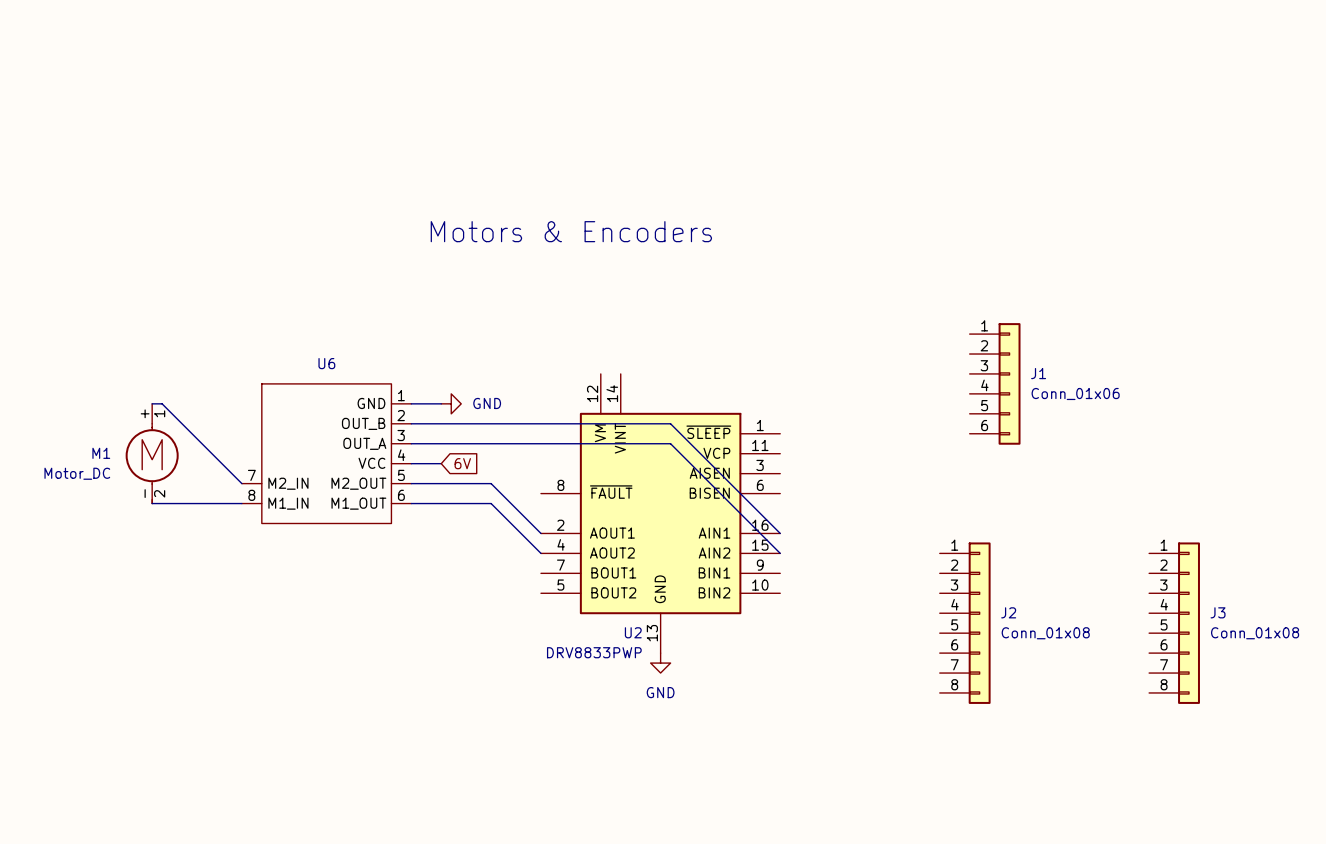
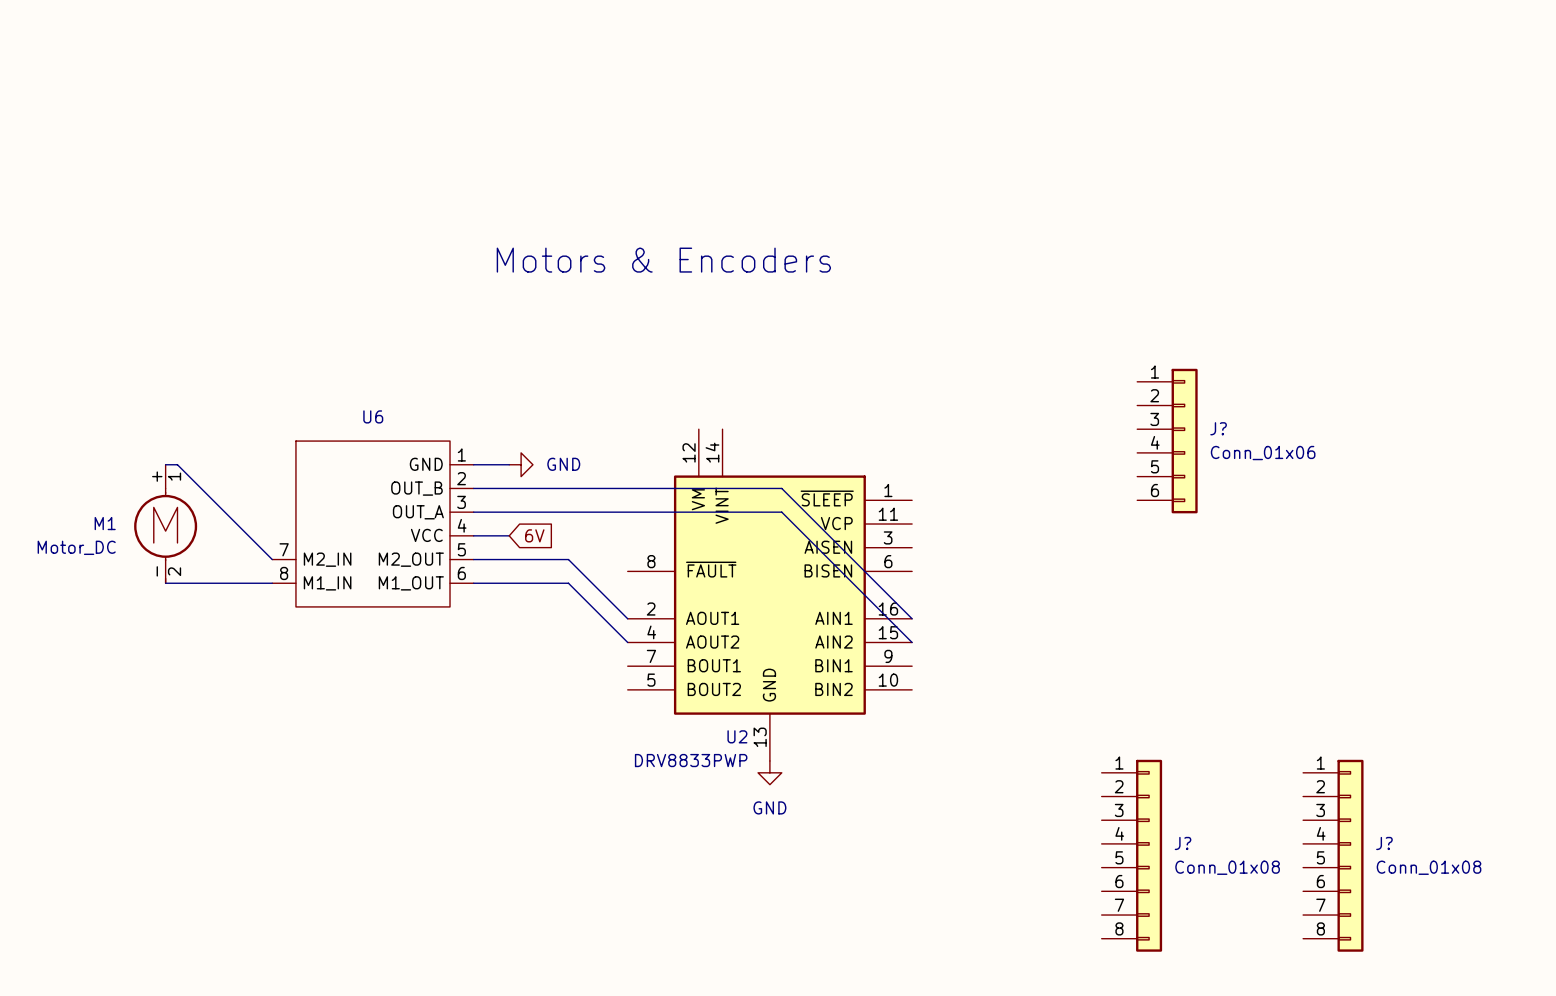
J1 name: J1 (1038, 373) -> J? (1218, 428)
J2: Conn_01x08 (965, 623) -> none
J3: Conn_01x08 (1174, 623) -> none
J?: none -> Conn_01x08 (1131, 855)
J?: none -> Conn_01x08 (1333, 855)

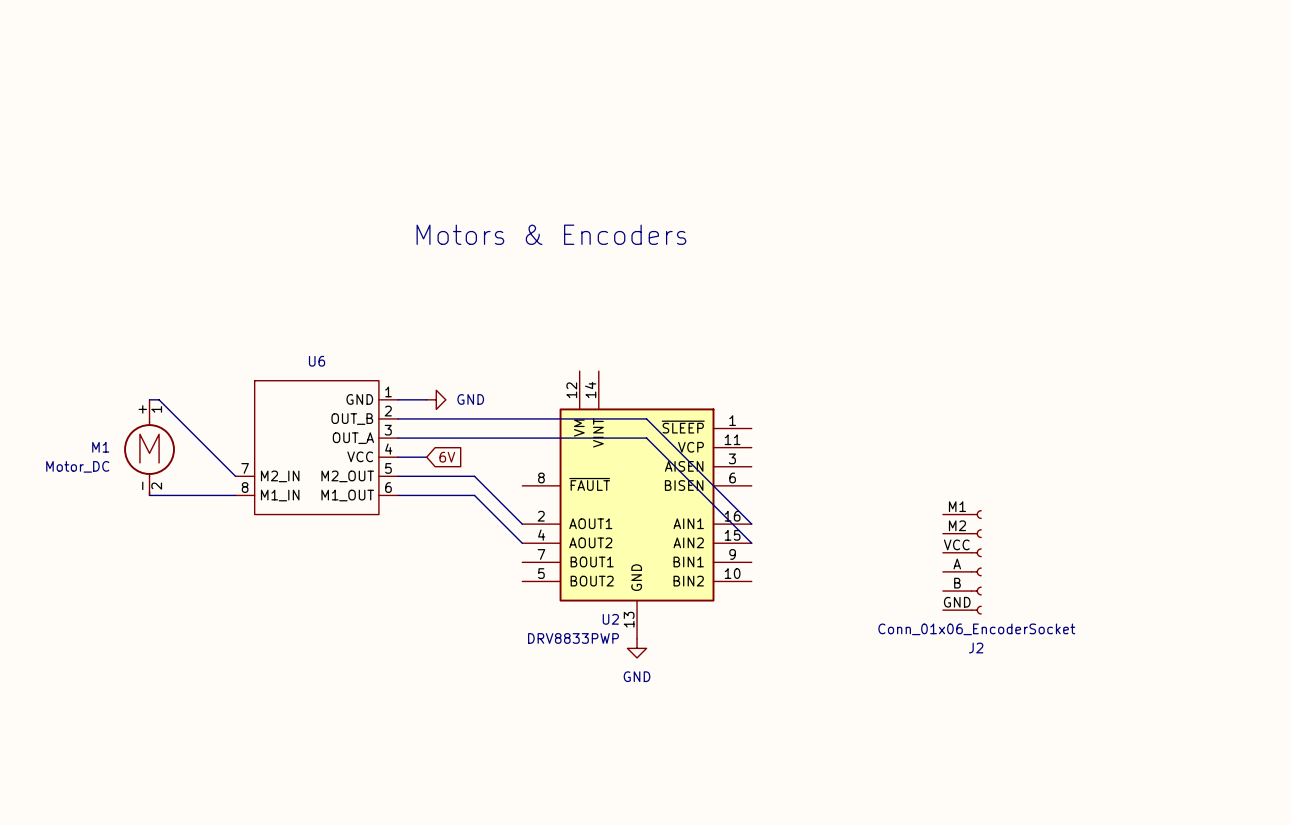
J?: Conn_01x06 (1167, 441) -> none
J2: none -> Conn_01x06_EncoderSocket (962, 562)
J?: Conn_01x08 (1131, 855) -> none
J?: Conn_01x08 (1333, 855) -> none

